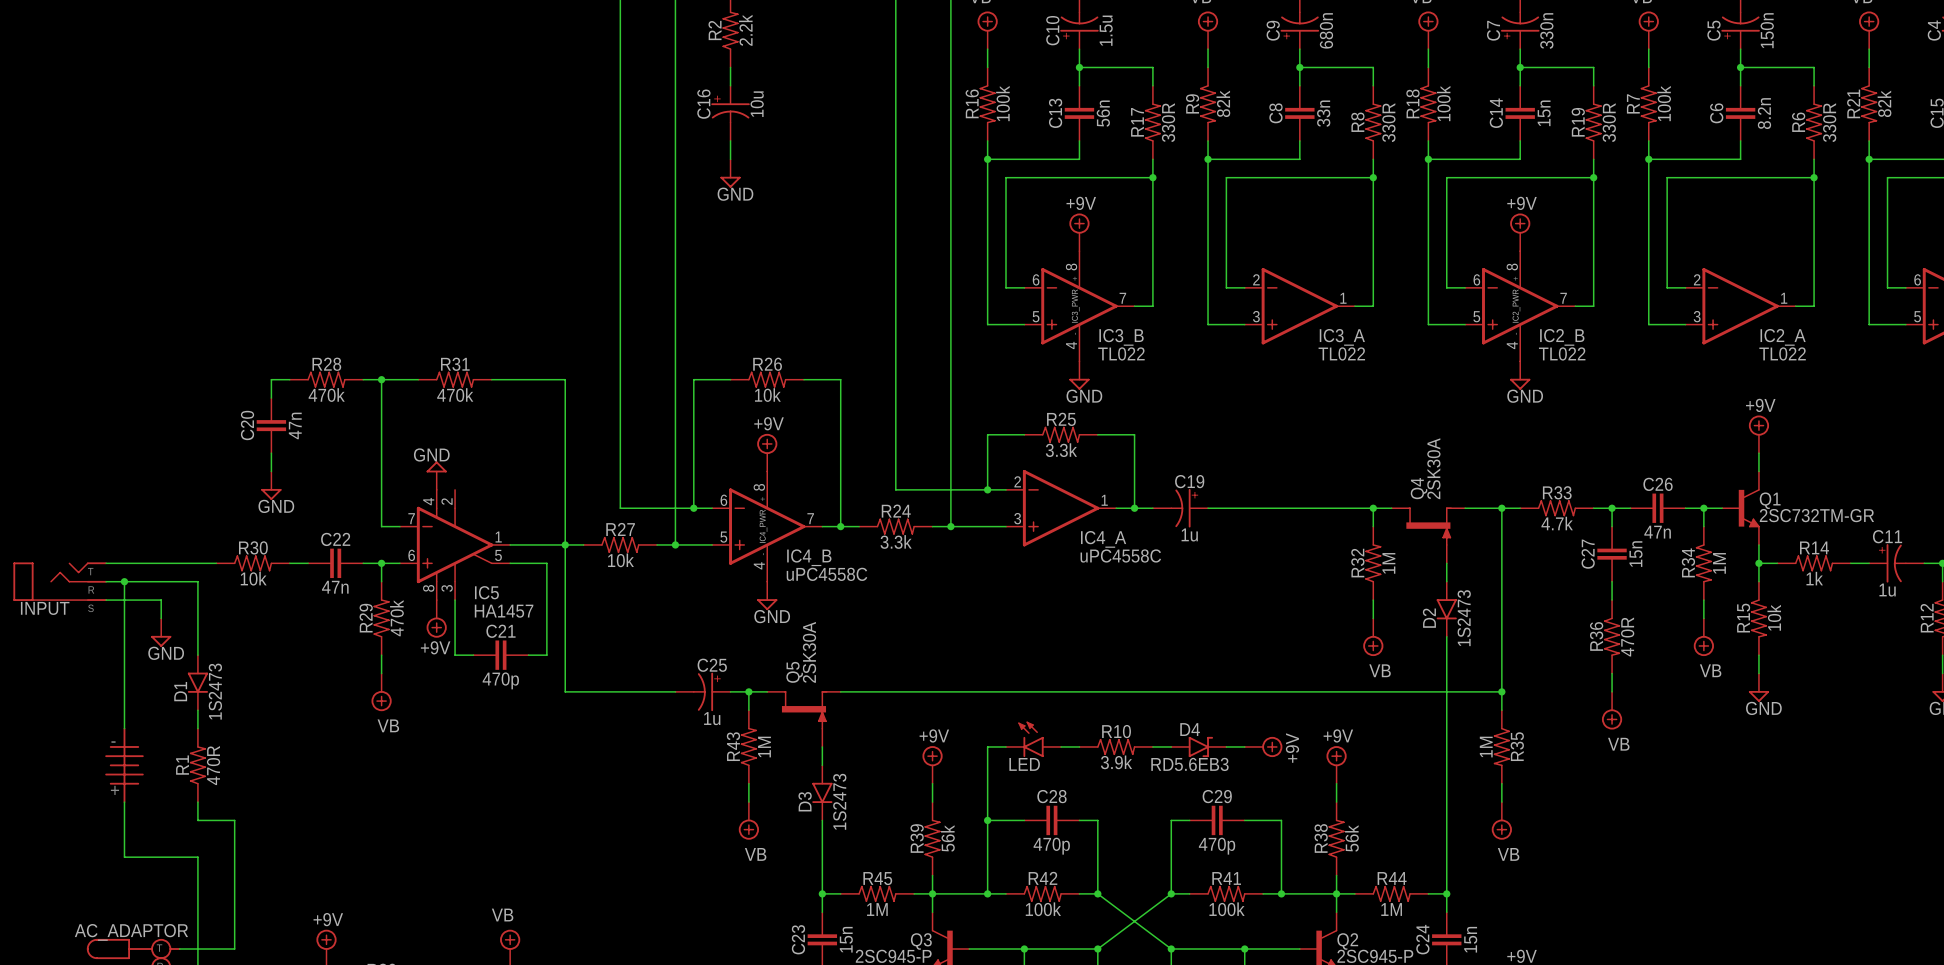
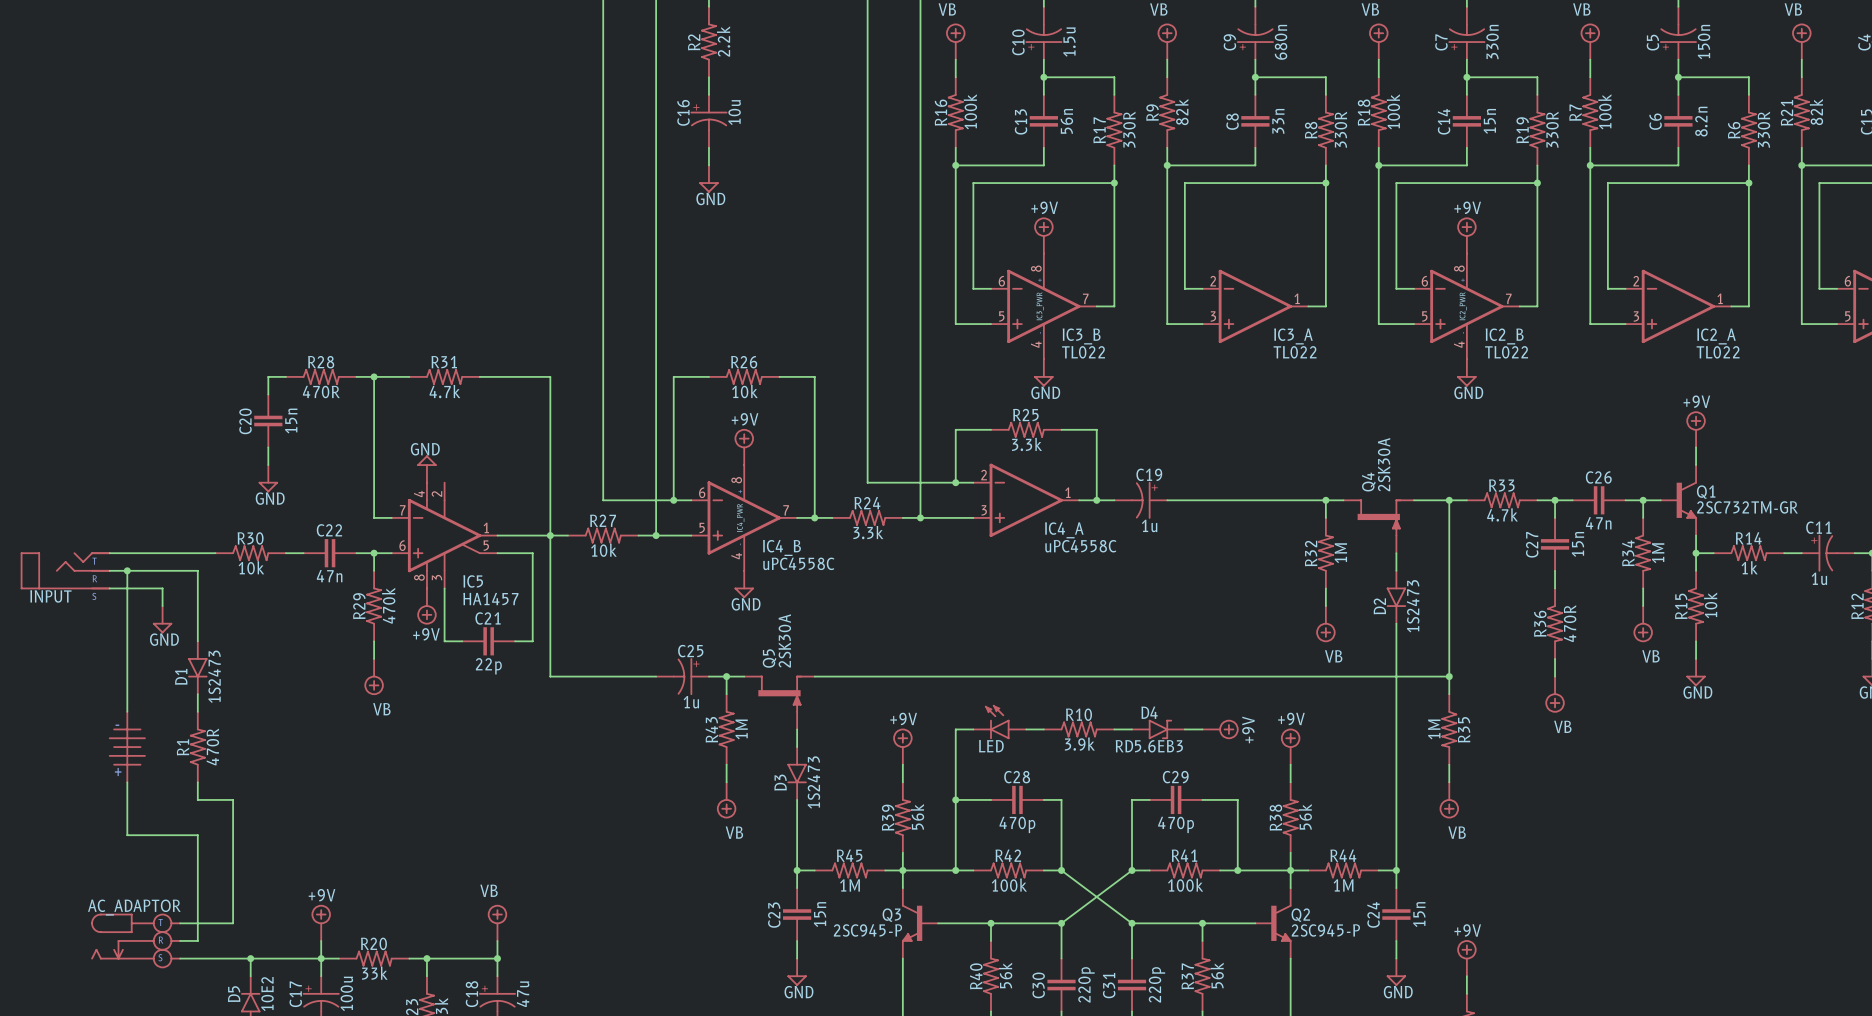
R28 value: 470k (326, 395) -> 470R (321, 391)
R31 value: 470k (455, 395) -> 4.7k (444, 391)
C20 value: 47n (295, 425) -> 15n (291, 421)
C21 value: 470p (500, 680) -> 22p (488, 666)

